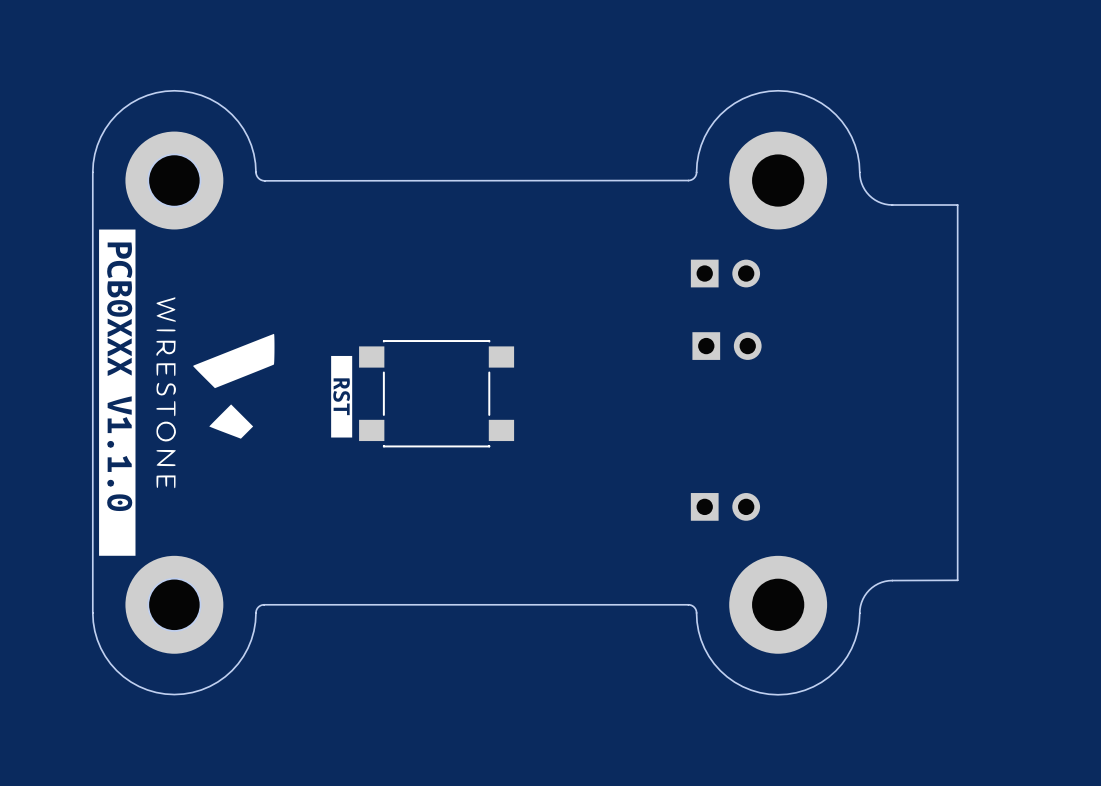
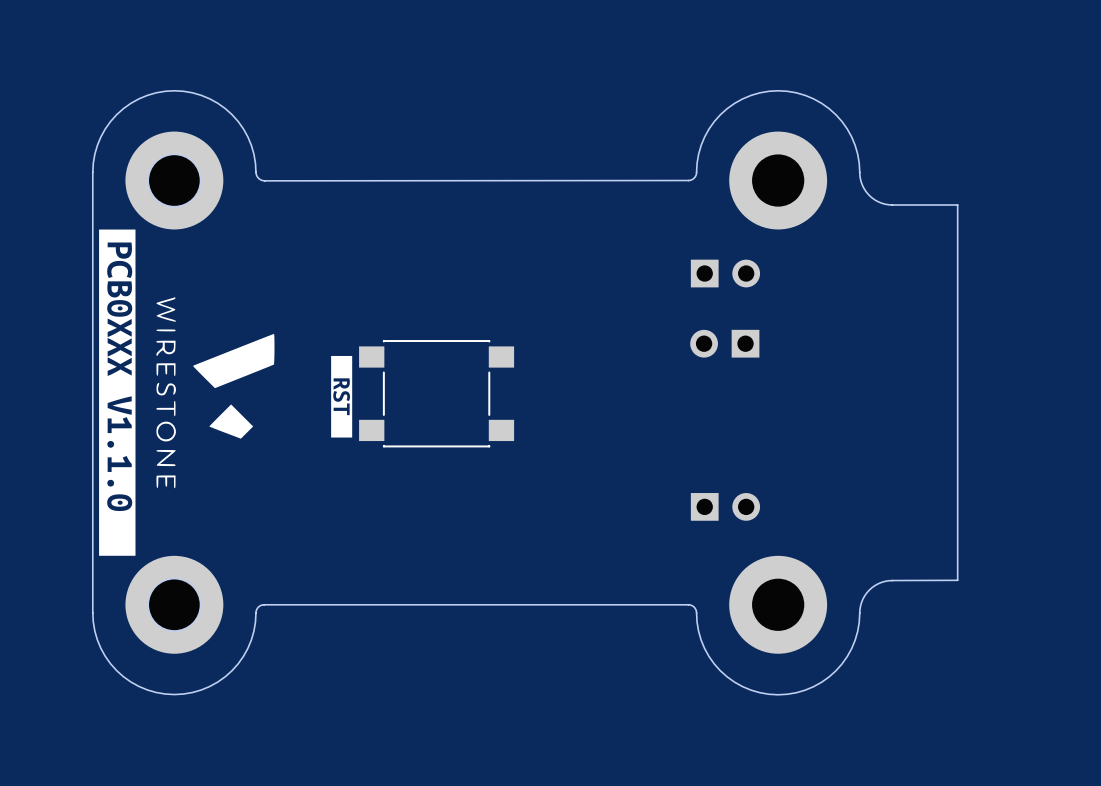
part rotation: 0° (727, 346) -> 180° (724, 343)

